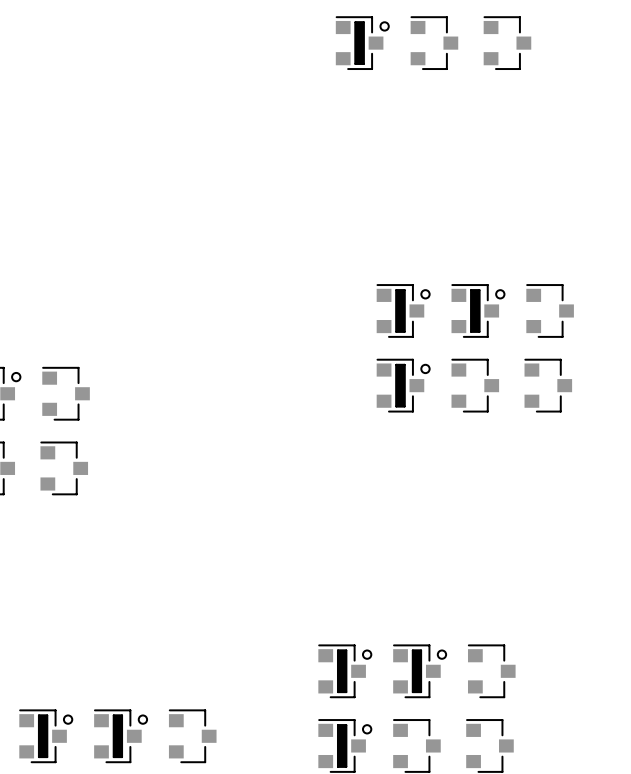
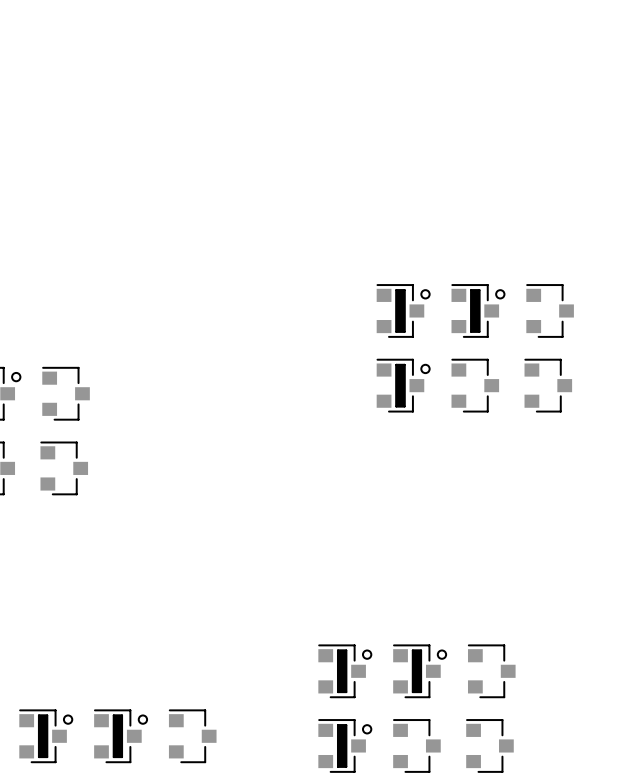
part: (362, 43) -> none
part: (434, 43) -> none
part: (507, 43) -> none

